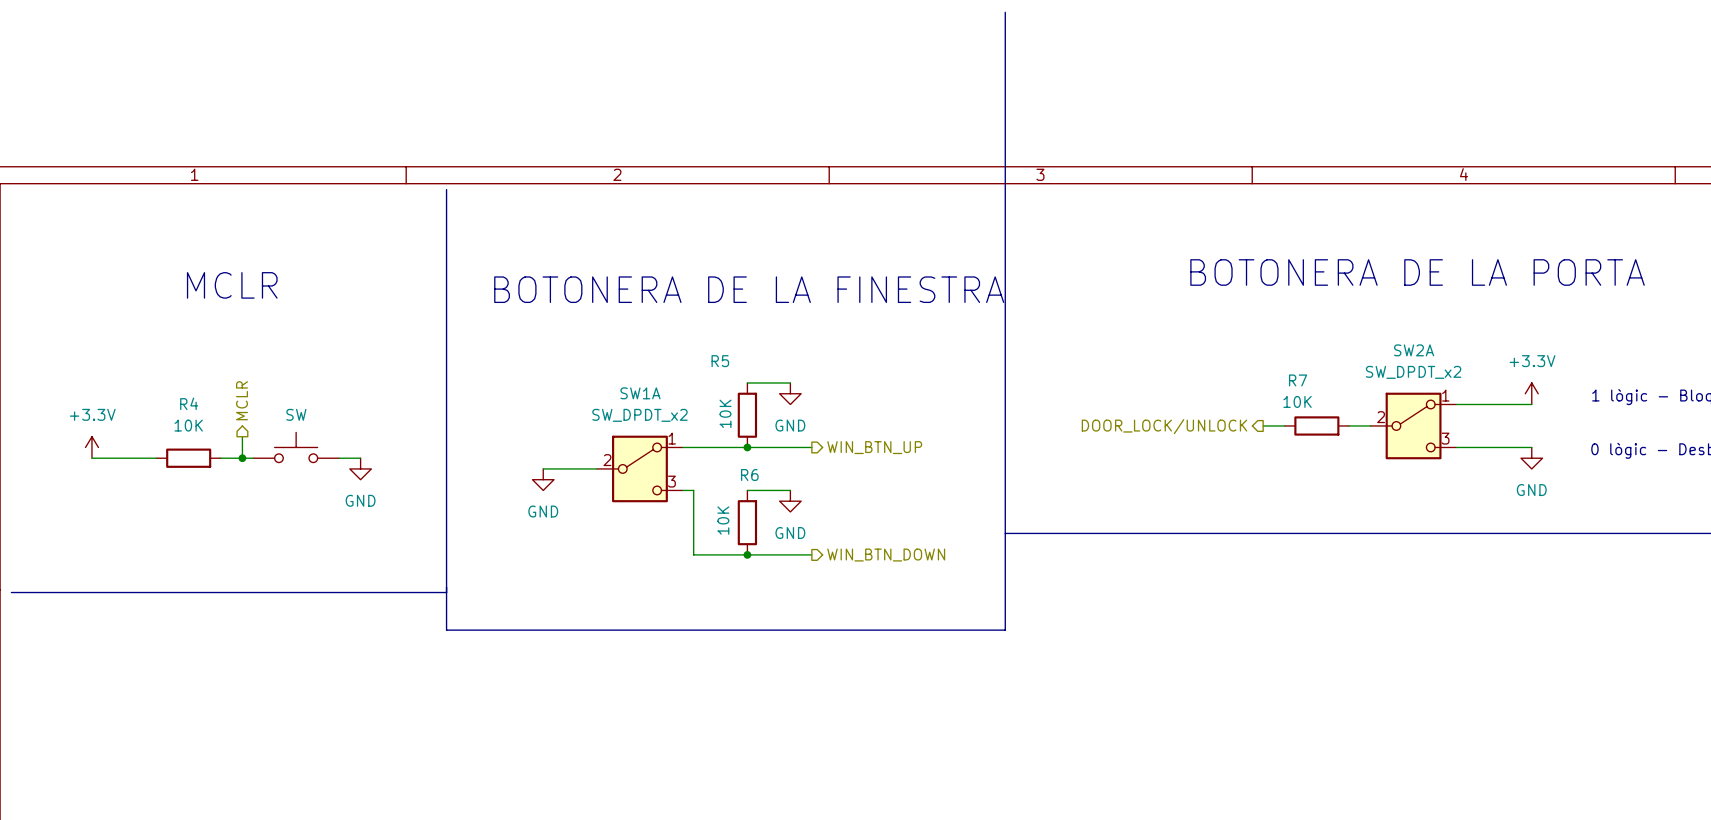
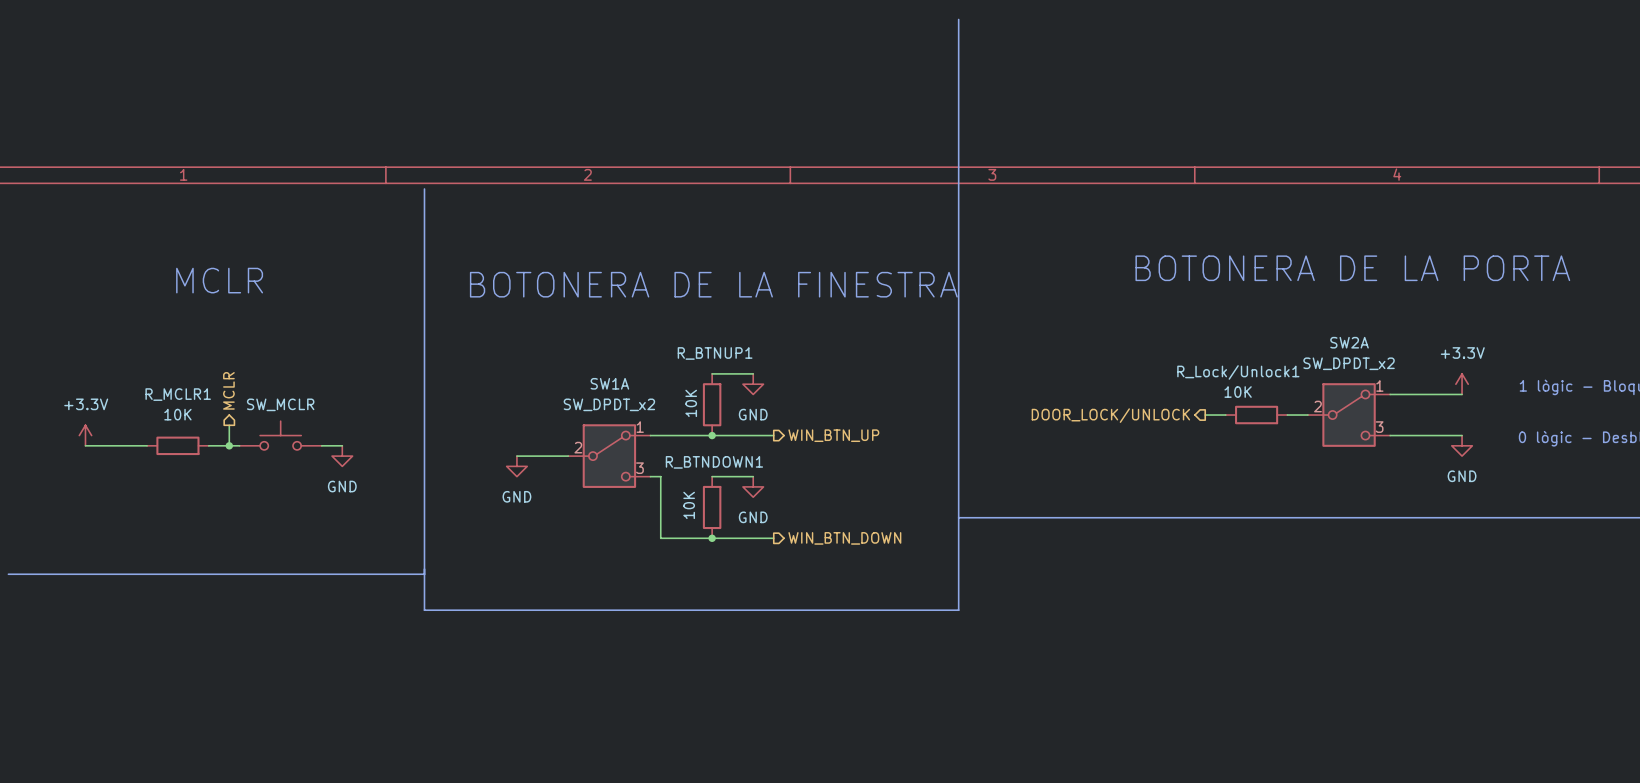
R5 name: R5 (720, 361) -> R_BTNUP1 (715, 353)
R7 name: R7 (1298, 380) -> R_Lock/Unlock1 (1238, 372)
R4 name: R4 (189, 403) -> R_MCLR1 (178, 394)
part value: SW (296, 414) -> SW_MCLR (280, 404)
R6 name: R6 (749, 475) -> R_BTNDOWN1 (714, 462)

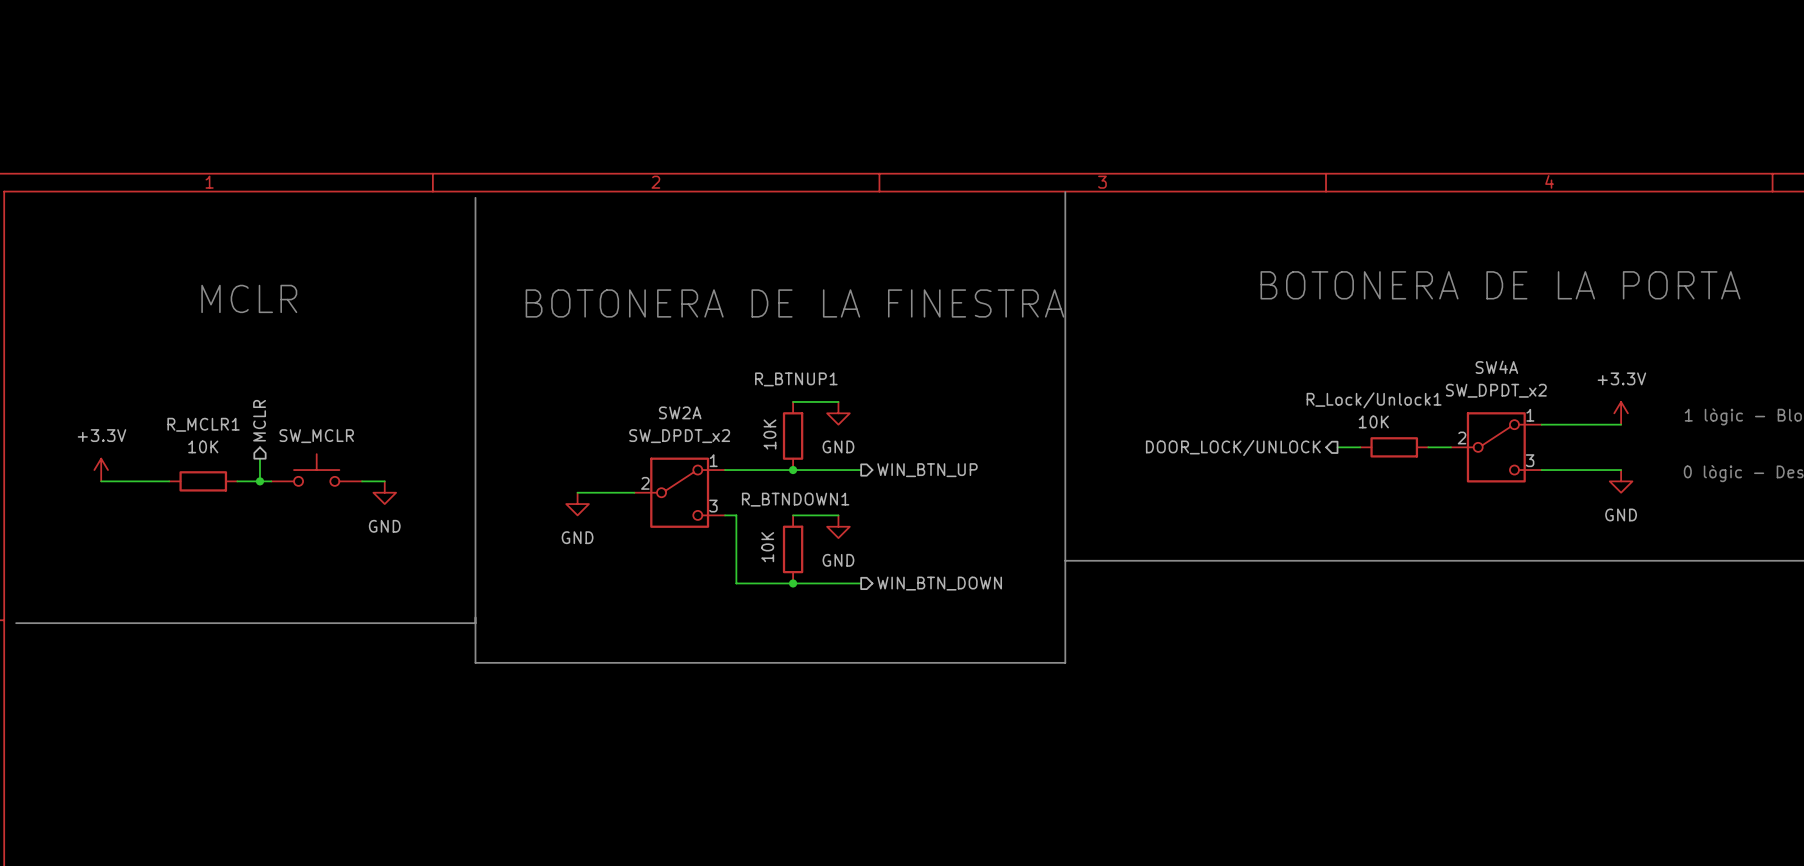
line: (958, 19) (958, 183) -> none
SW2A name: SW2A (1349, 342) -> SW4A (1496, 367)
SW1A name: SW1A (609, 383) -> SW2A (680, 412)

